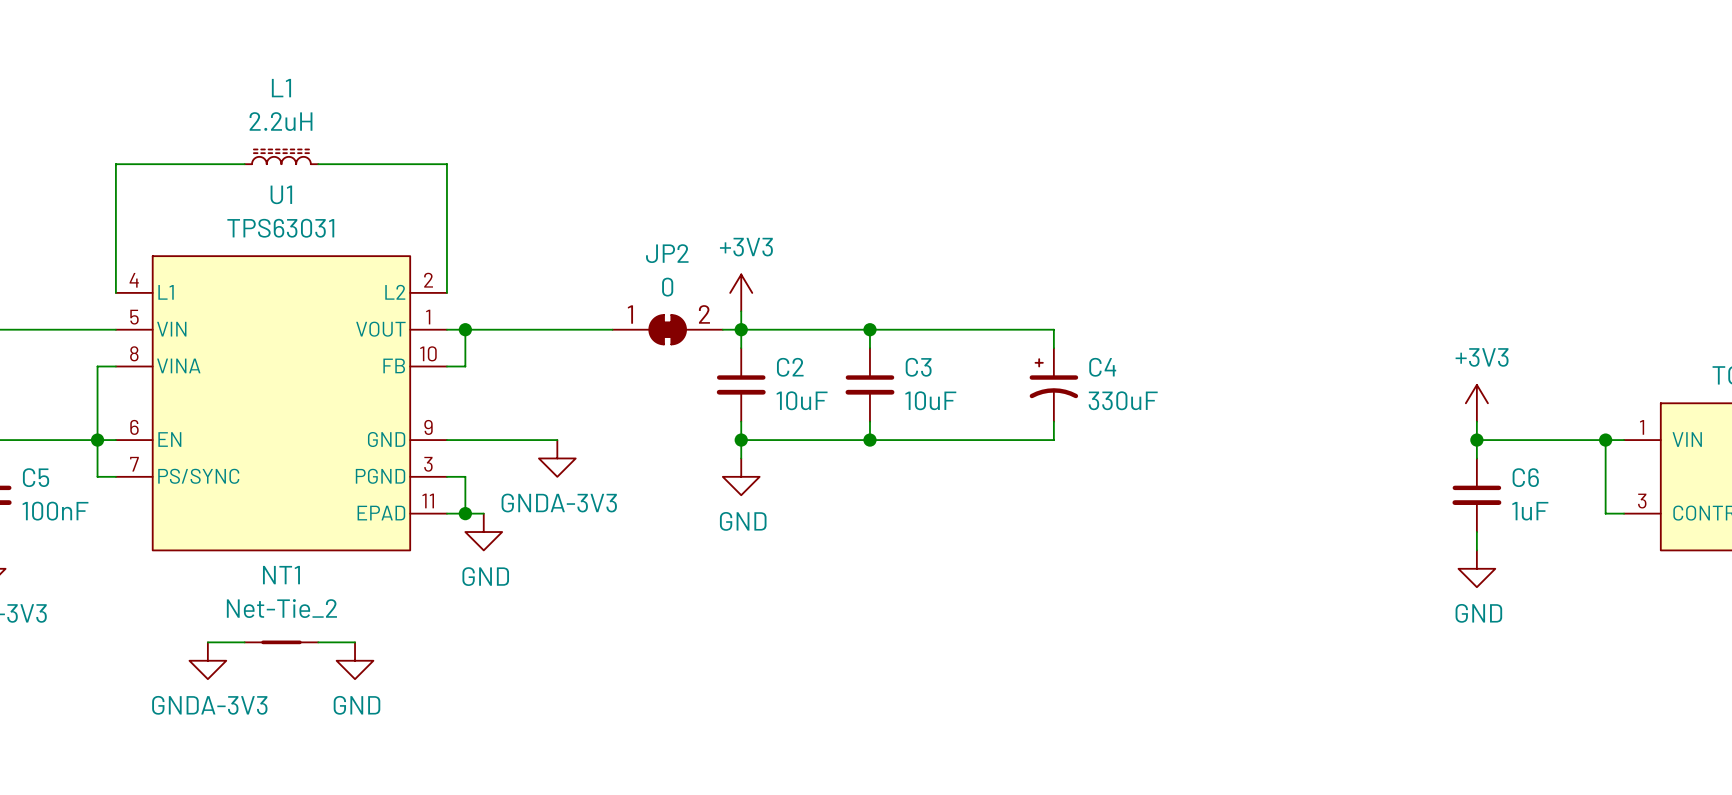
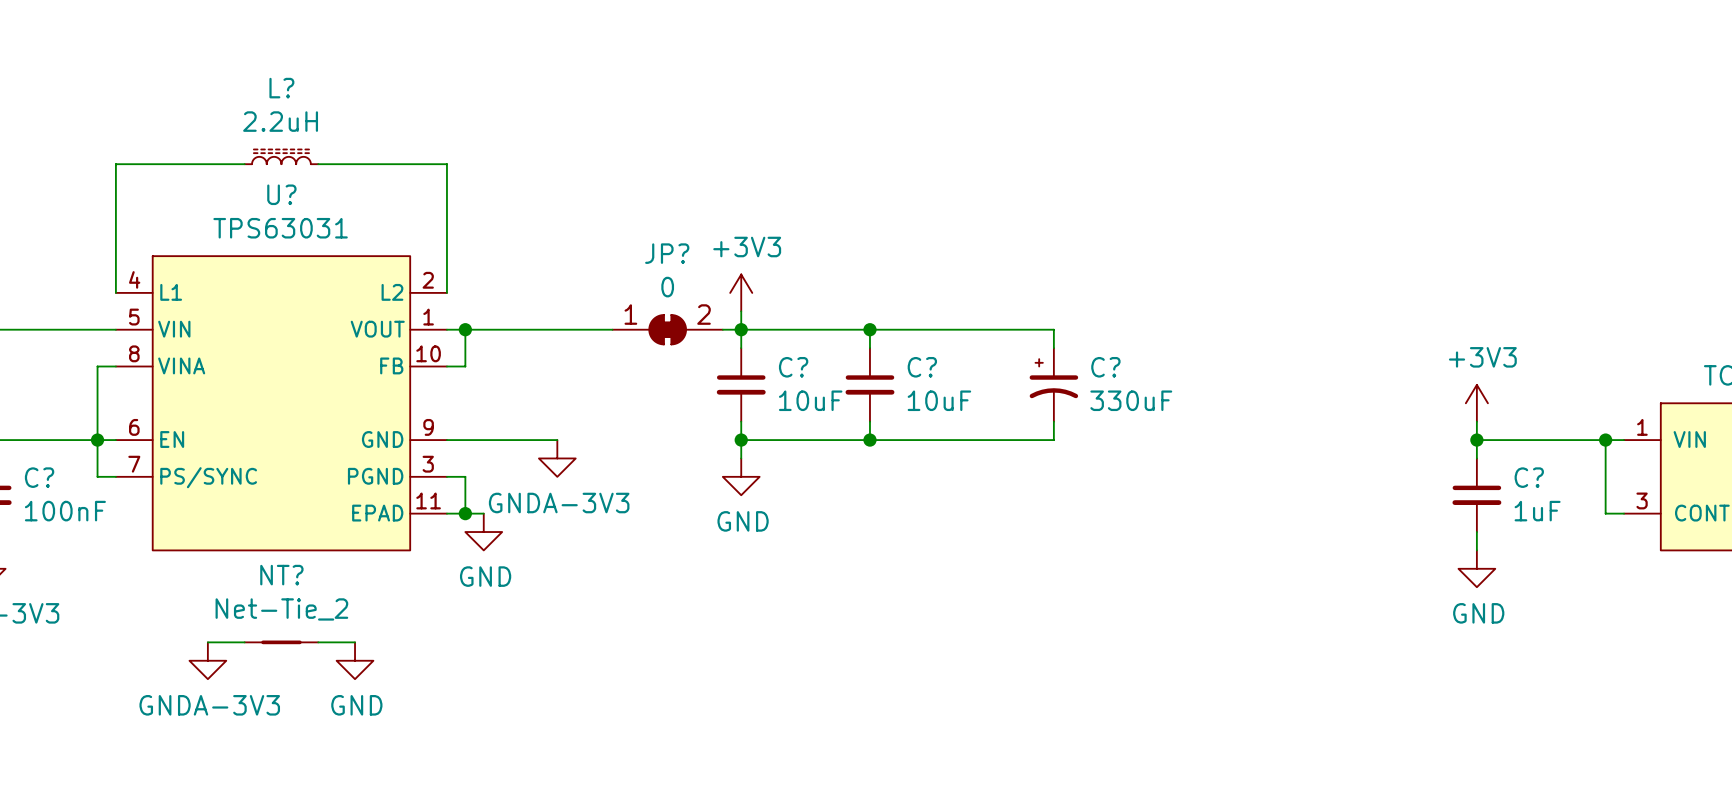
L1 name: L1 (281, 88) -> L? (281, 88)
U1 name: U1 (281, 194) -> U? (281, 194)
JP2 name: JP2 (667, 253) -> JP? (667, 253)
C2 name: C2 (790, 367) -> C? (793, 367)
C3 name: C3 (918, 367) -> C? (922, 367)
C4 name: C4 (1102, 367) -> C? (1105, 367)
C5 name: C5 (36, 477) -> C? (39, 477)
C6 name: C6 (1525, 477) -> C? (1529, 477)
NT1 name: NT1 (281, 575) -> NT? (281, 575)

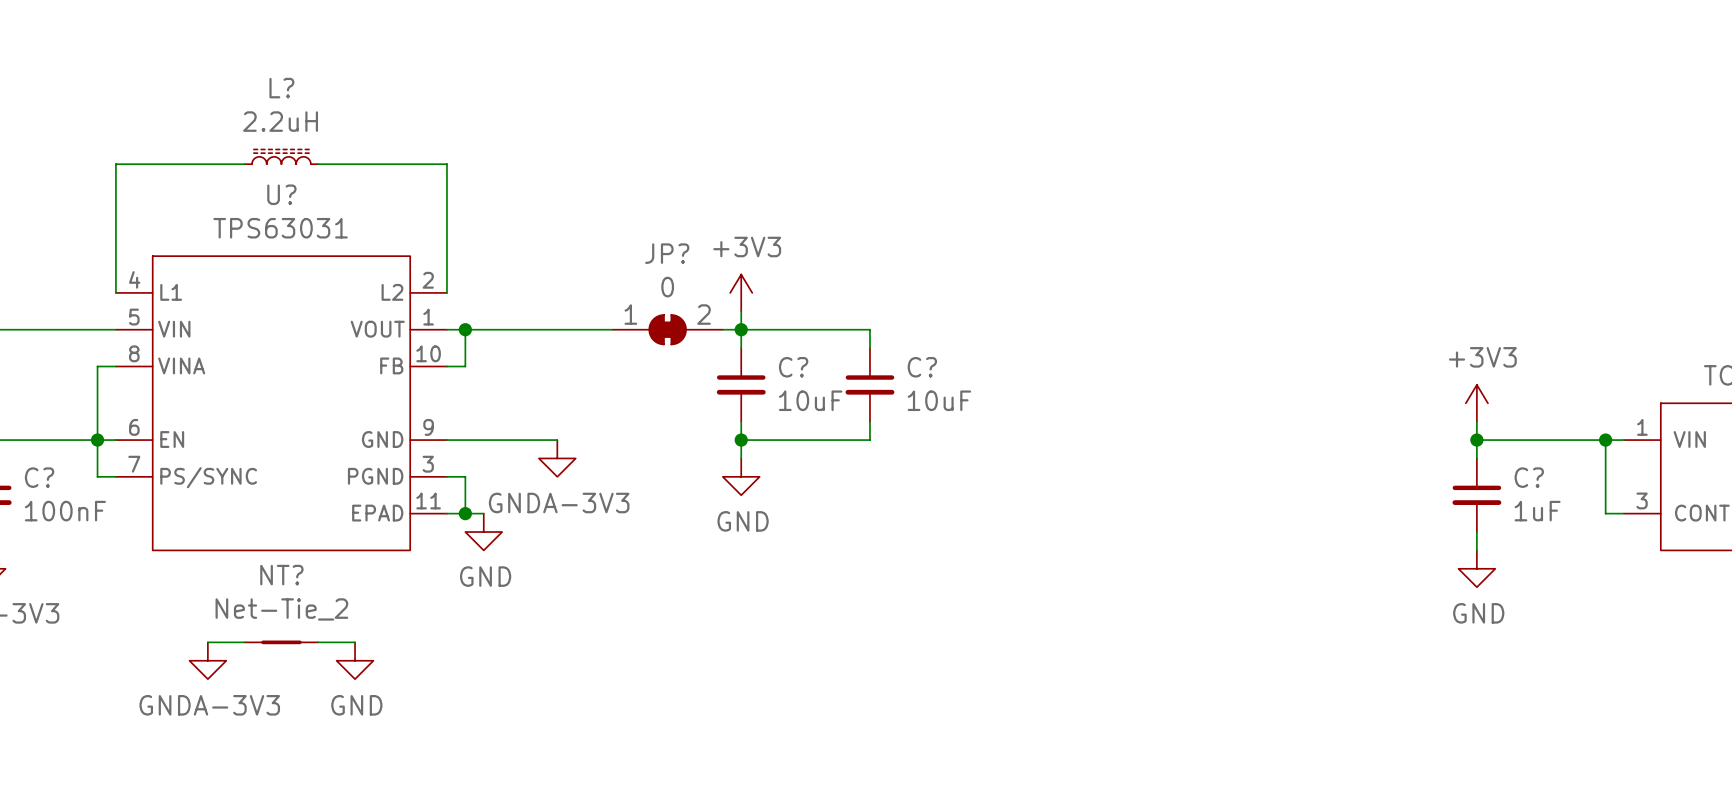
wire: (869, 329) (1053, 329) (1053, 348) -> none
junction: (869, 329) -> none
C?: 330uF (1053, 384) -> none
wire: (1053, 421) (1053, 440) (869, 440) -> none
junction: (869, 440) -> none

